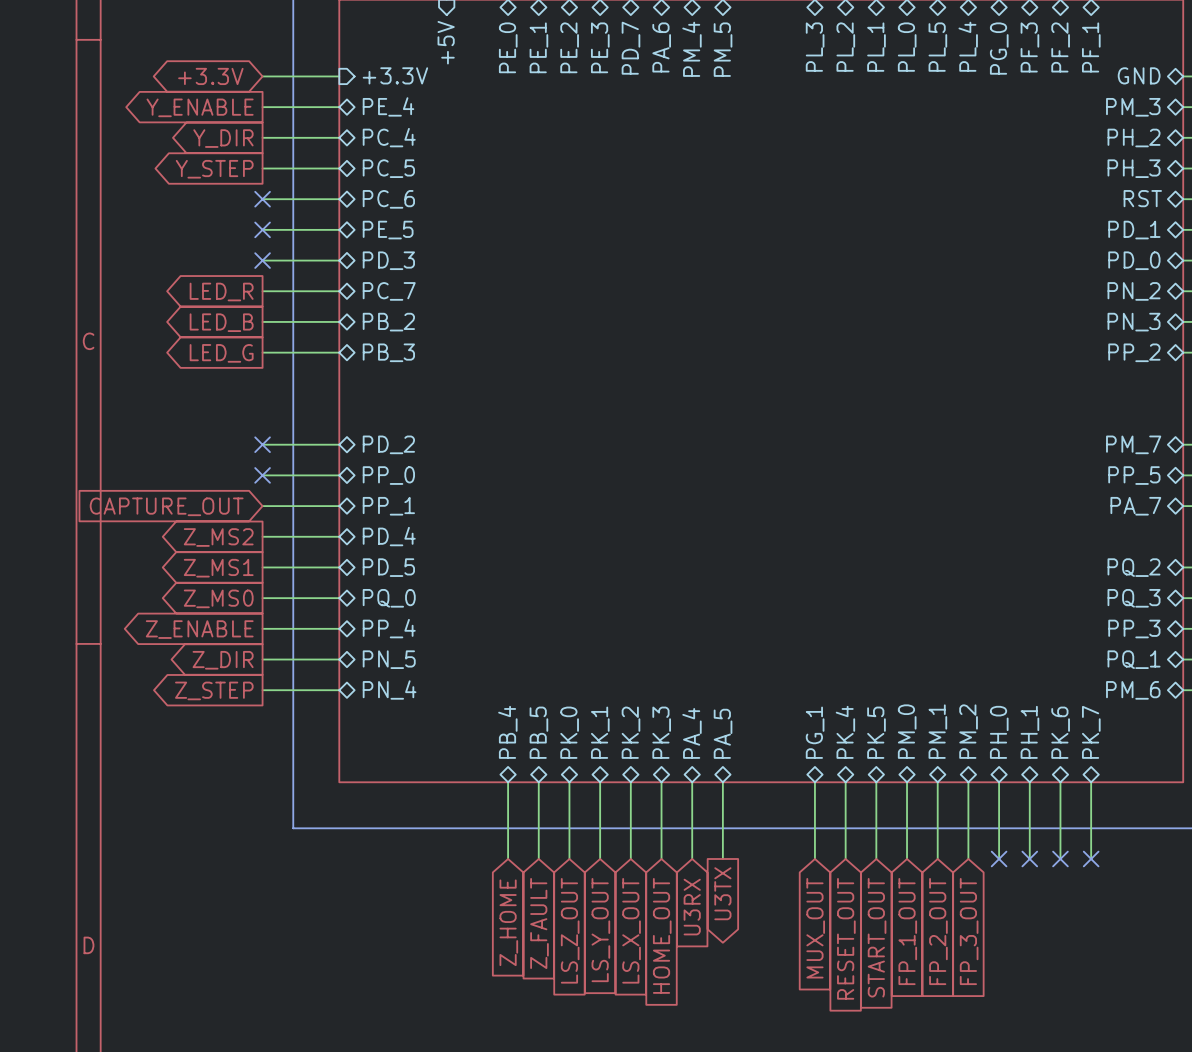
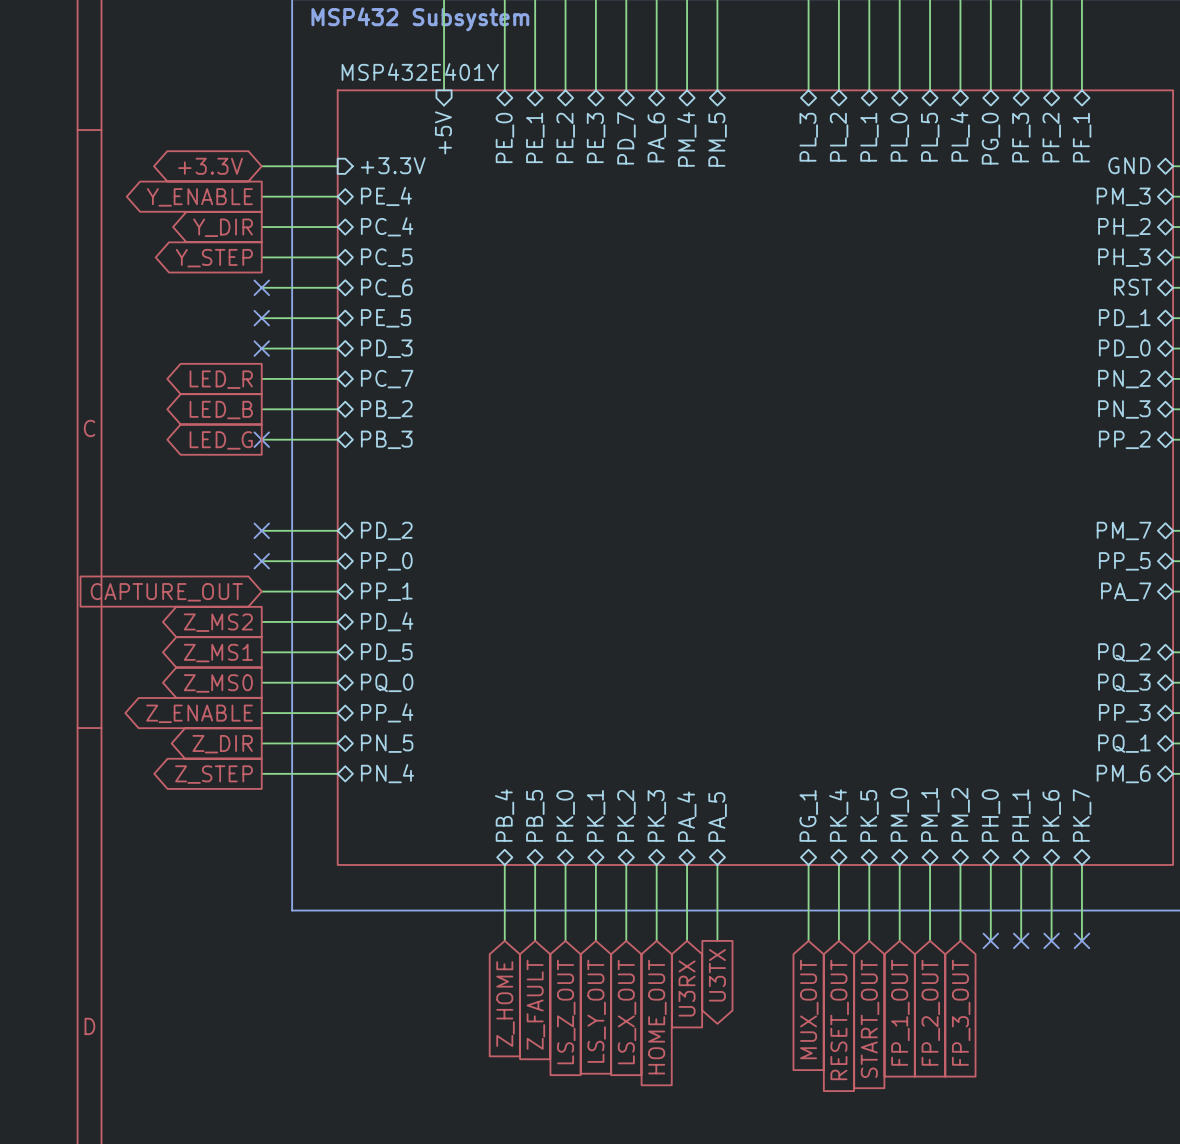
no-connect mark: none -> (261, 439)

